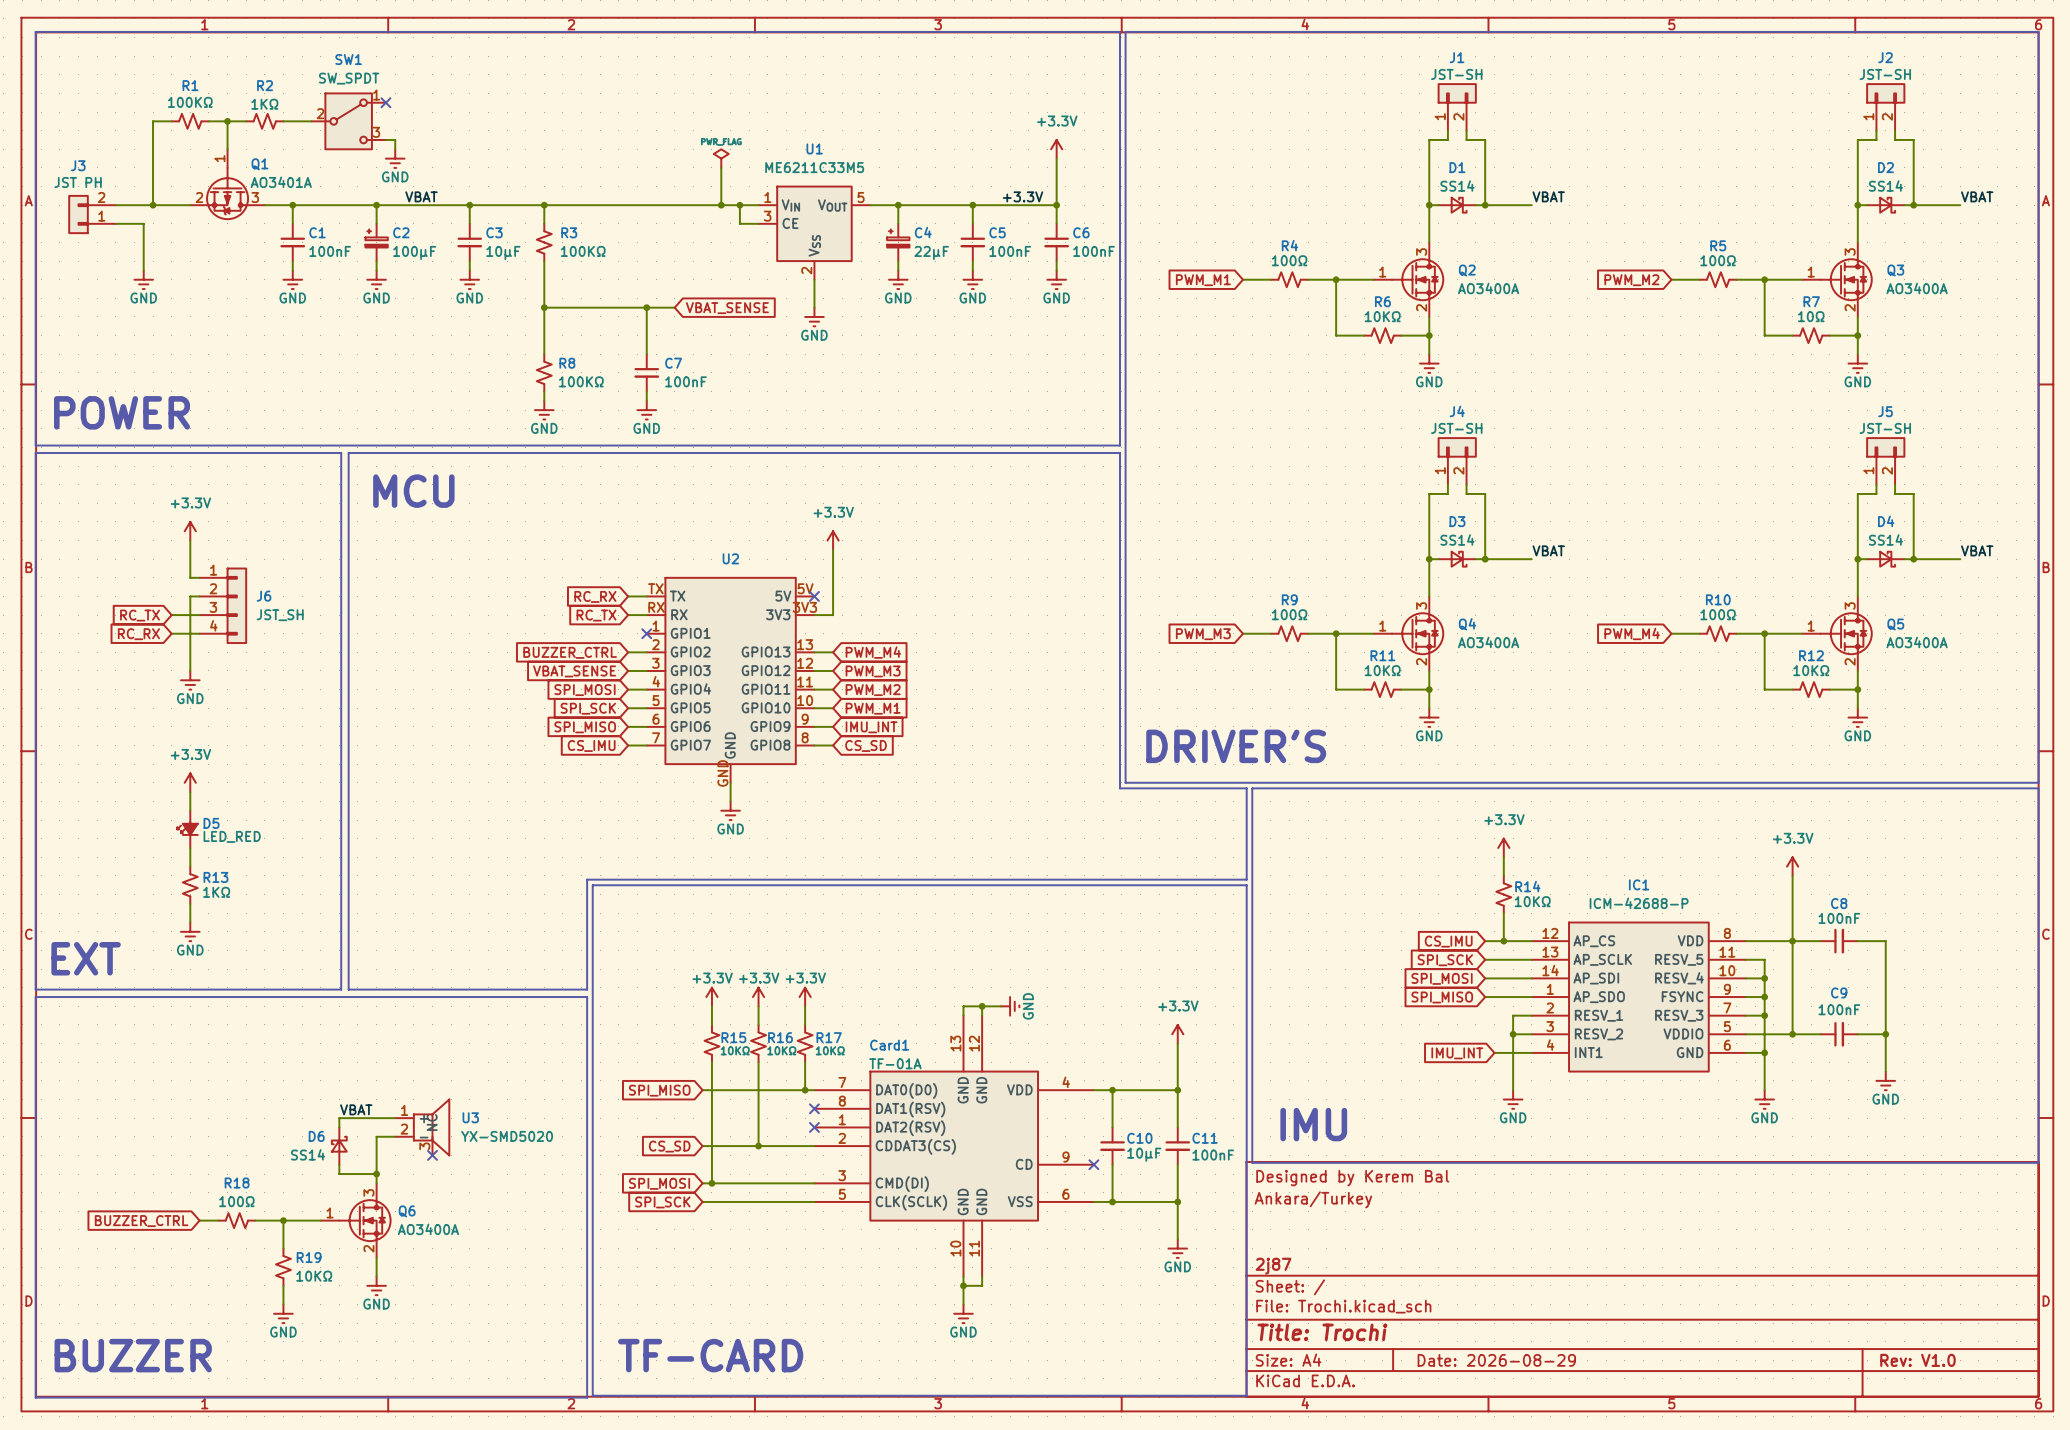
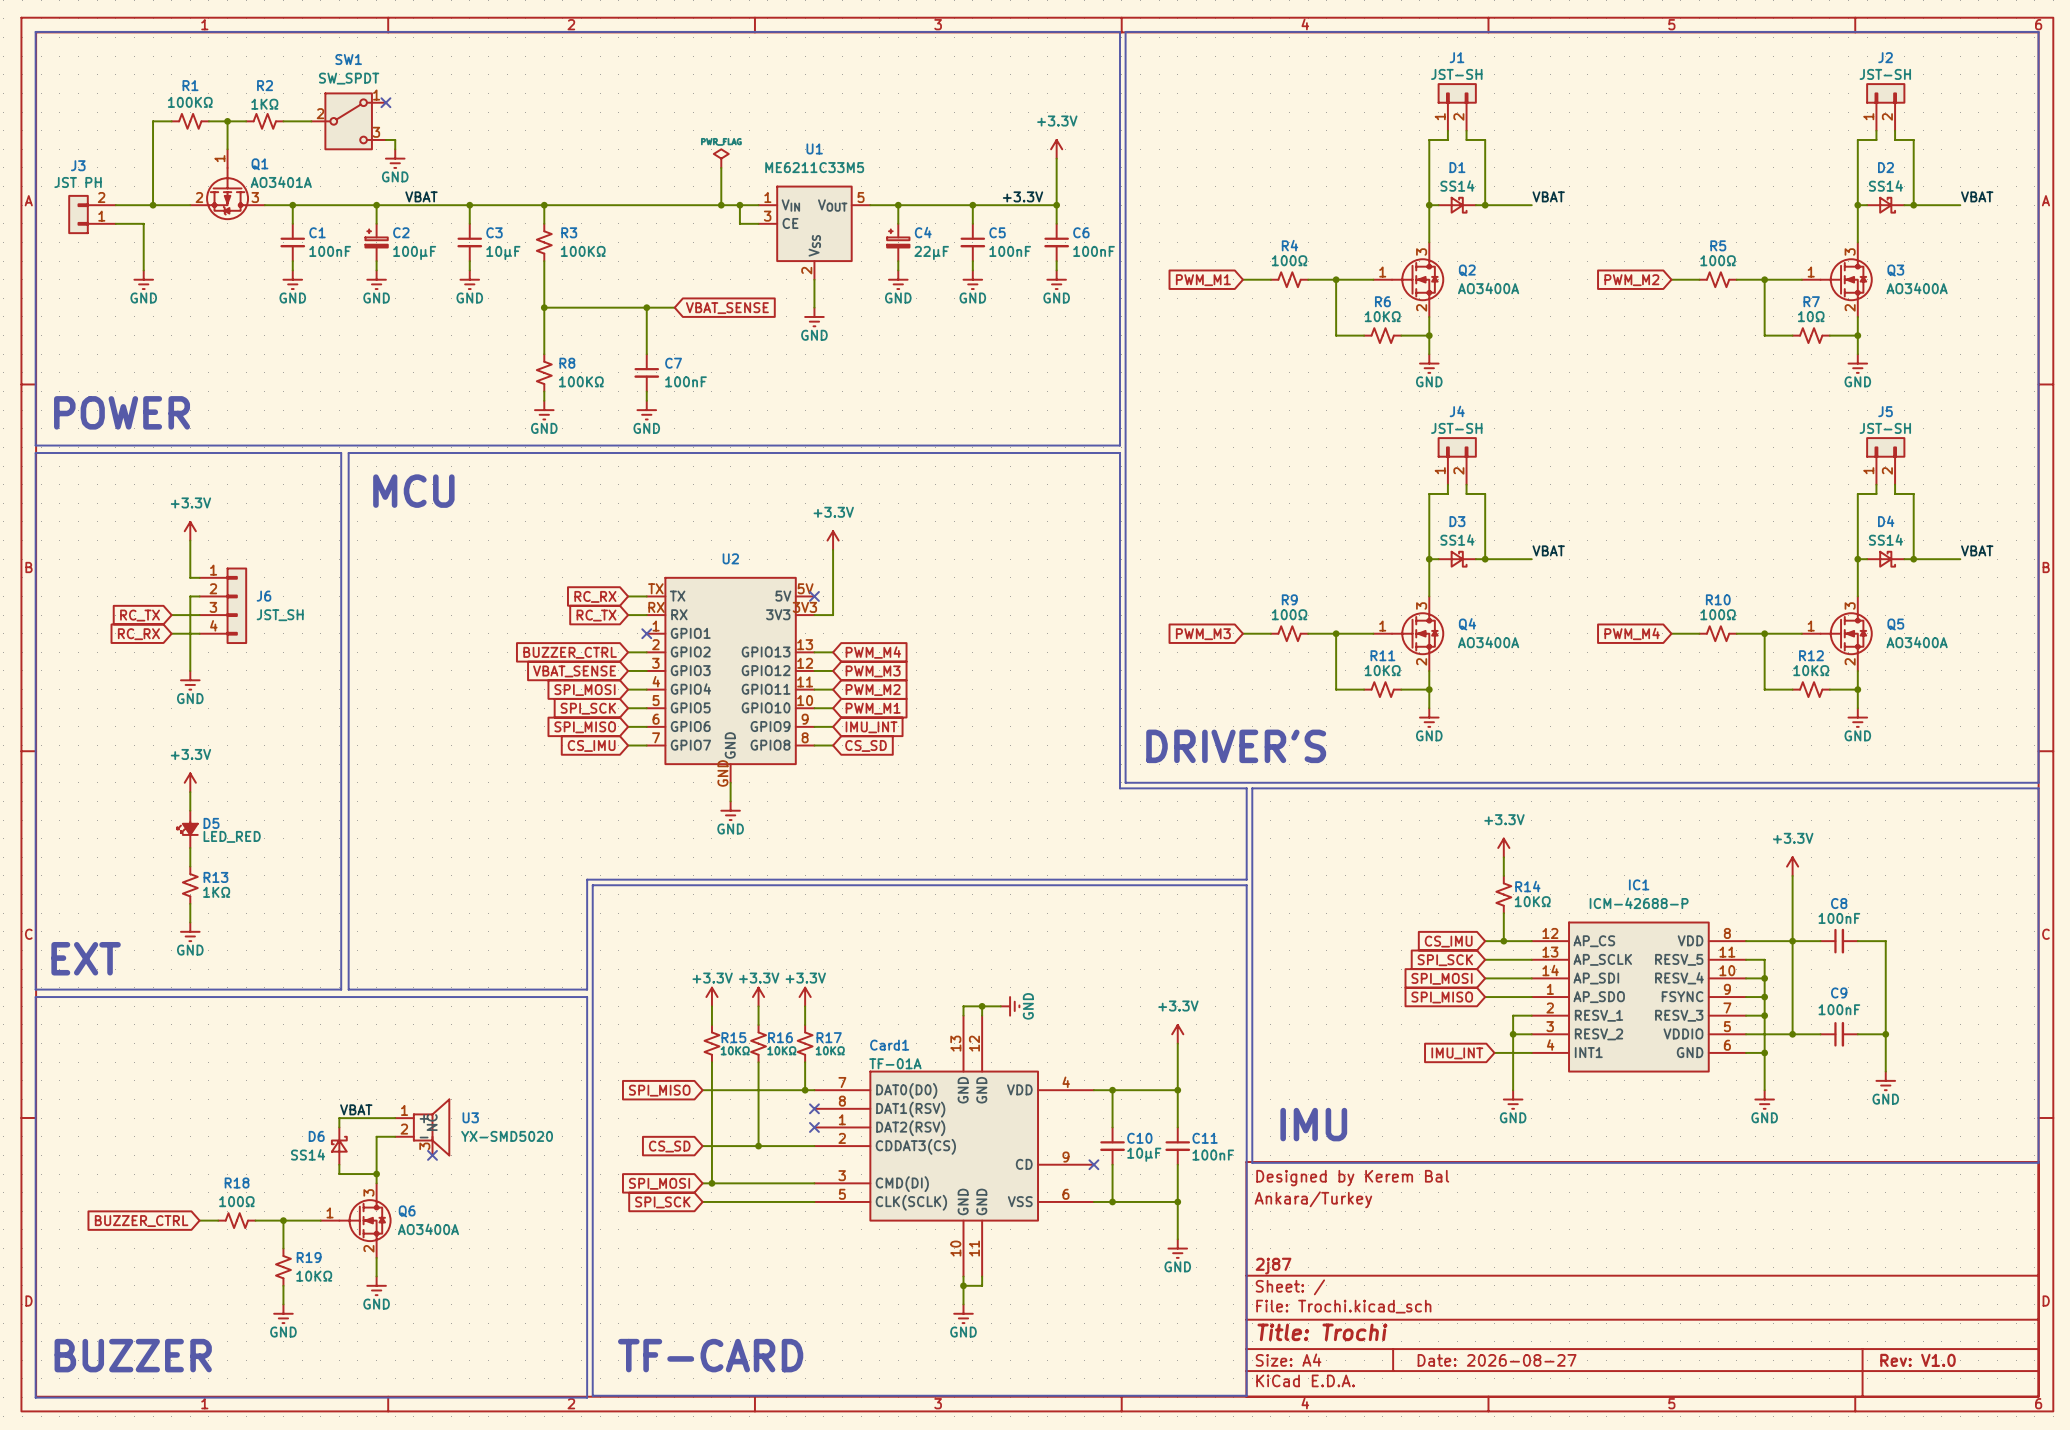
title block: Date: 2026-08-29 (1496, 1360) -> Date: 2026-08-27 (1497, 1360)

